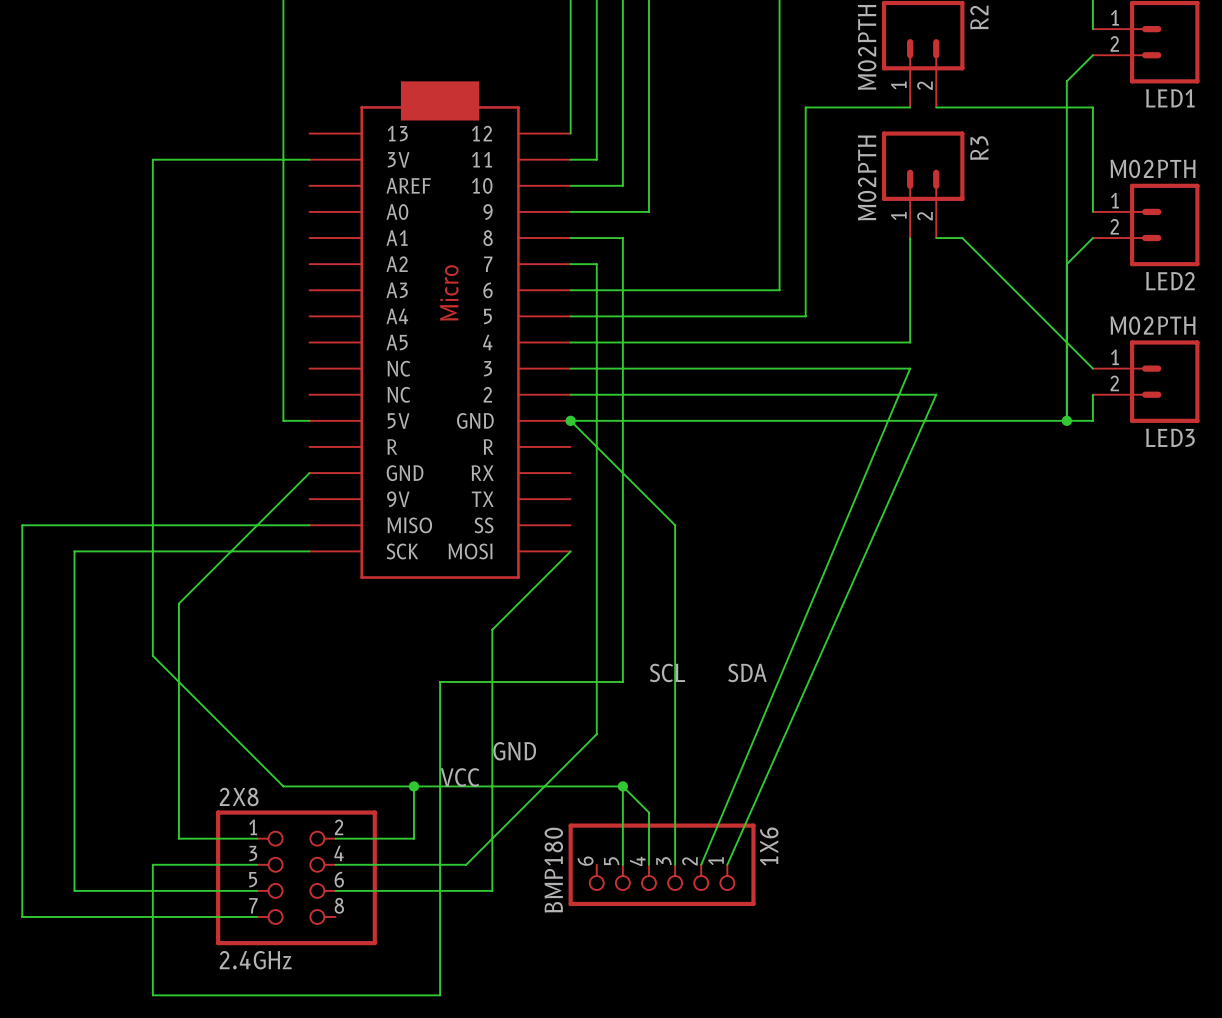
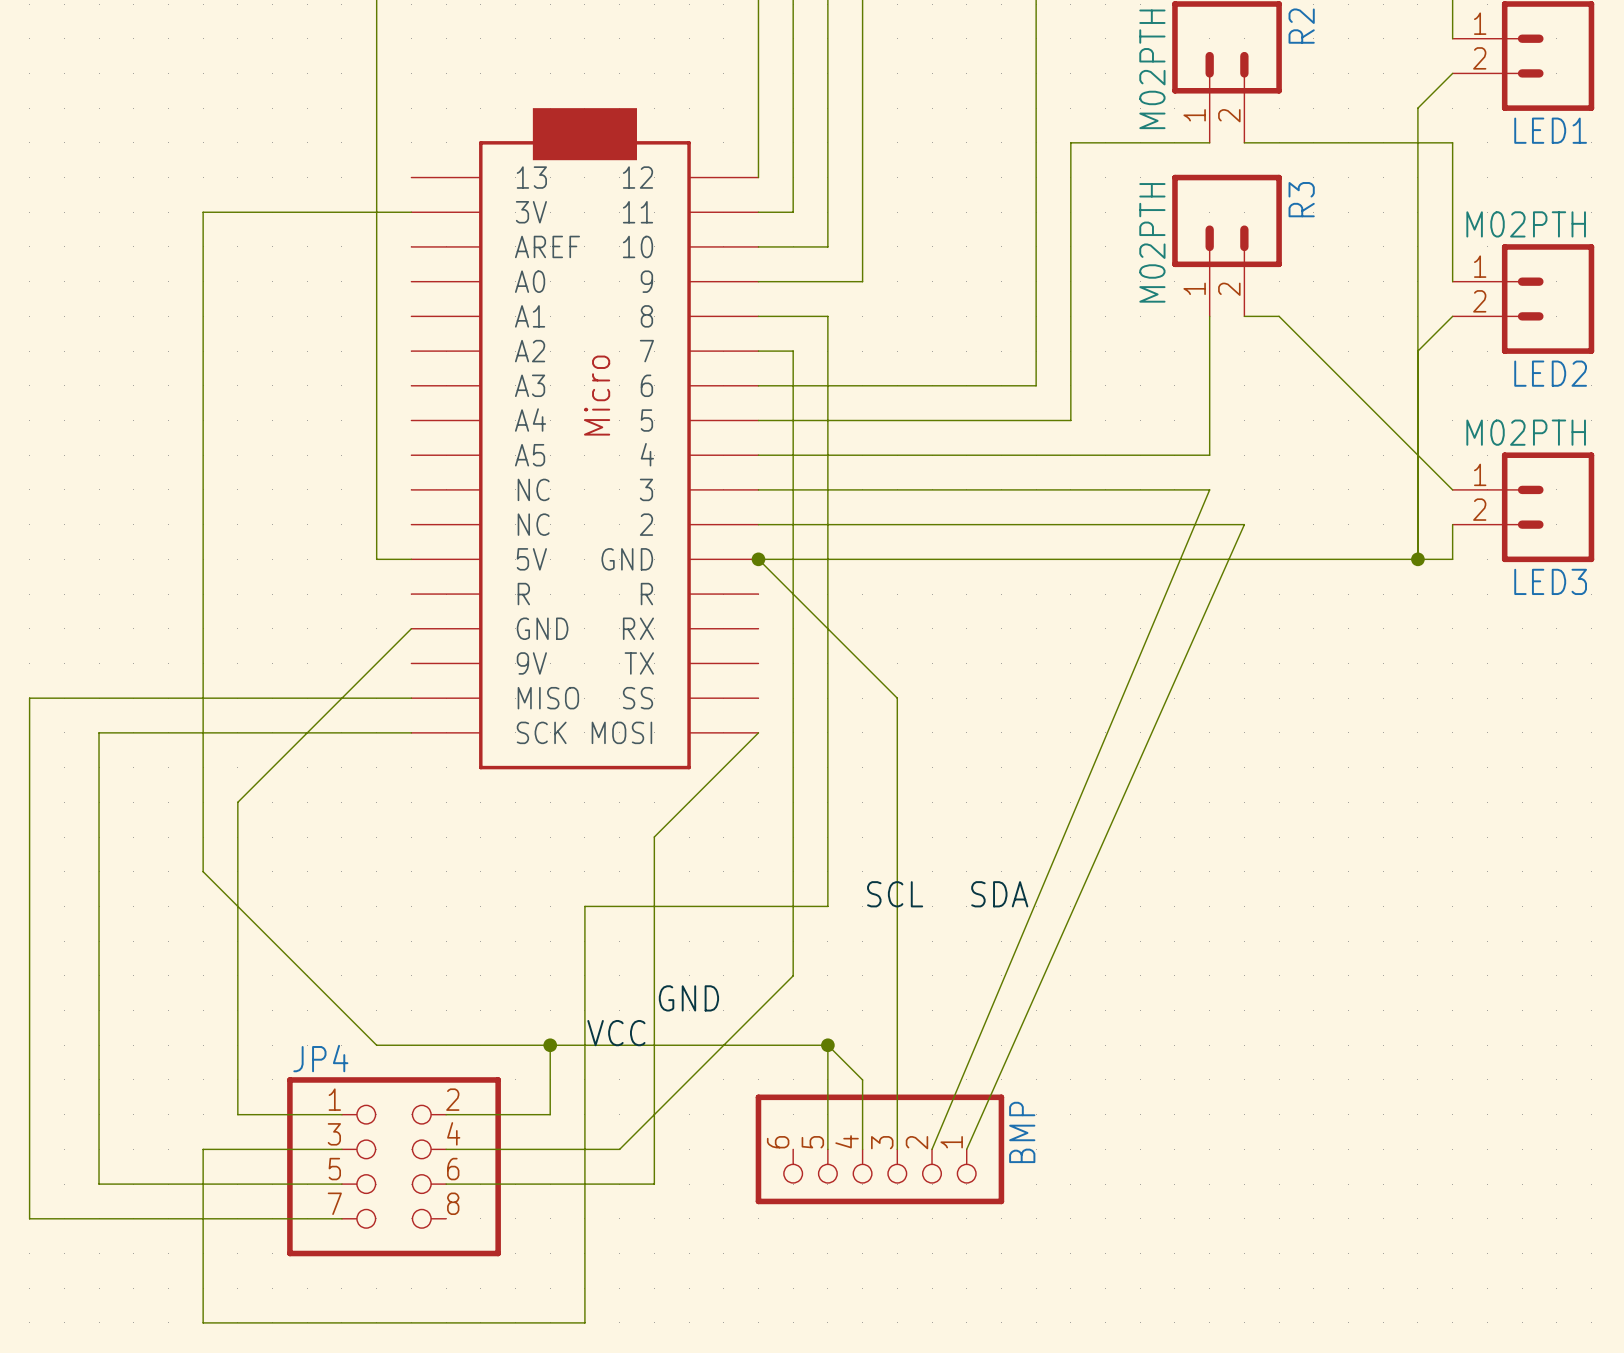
2X8 name: 2X8 (239, 796) -> JP4 (320, 1058)
1X6 name: 1X6 (769, 846) -> BMP (1022, 1132)
1X6 value: BMP180 (553, 870) -> none
2X8 value: 2.4GHz (255, 960) -> none

